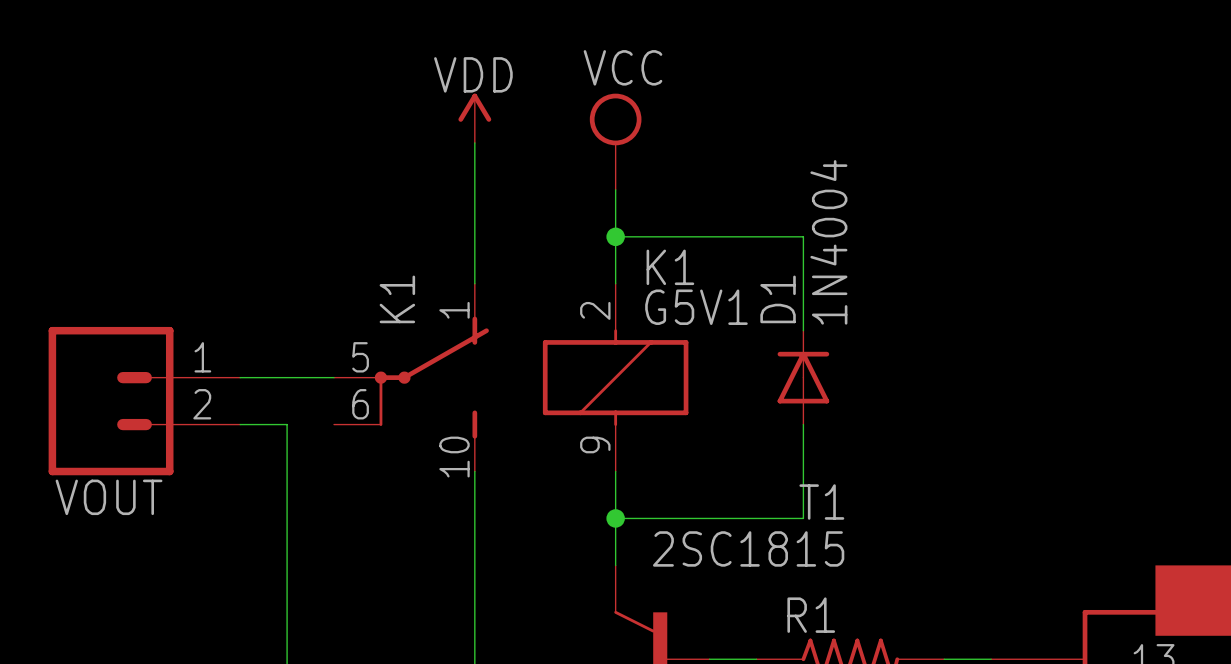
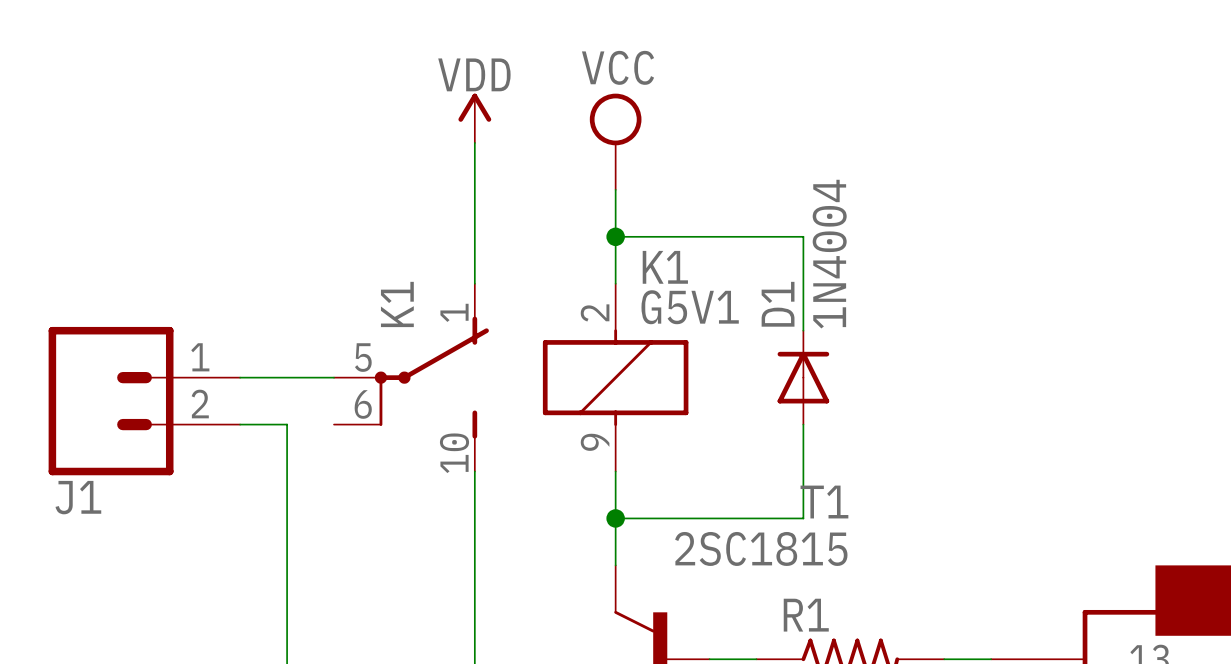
VOUT name: VOUT (109, 497) -> J1 (78, 497)

